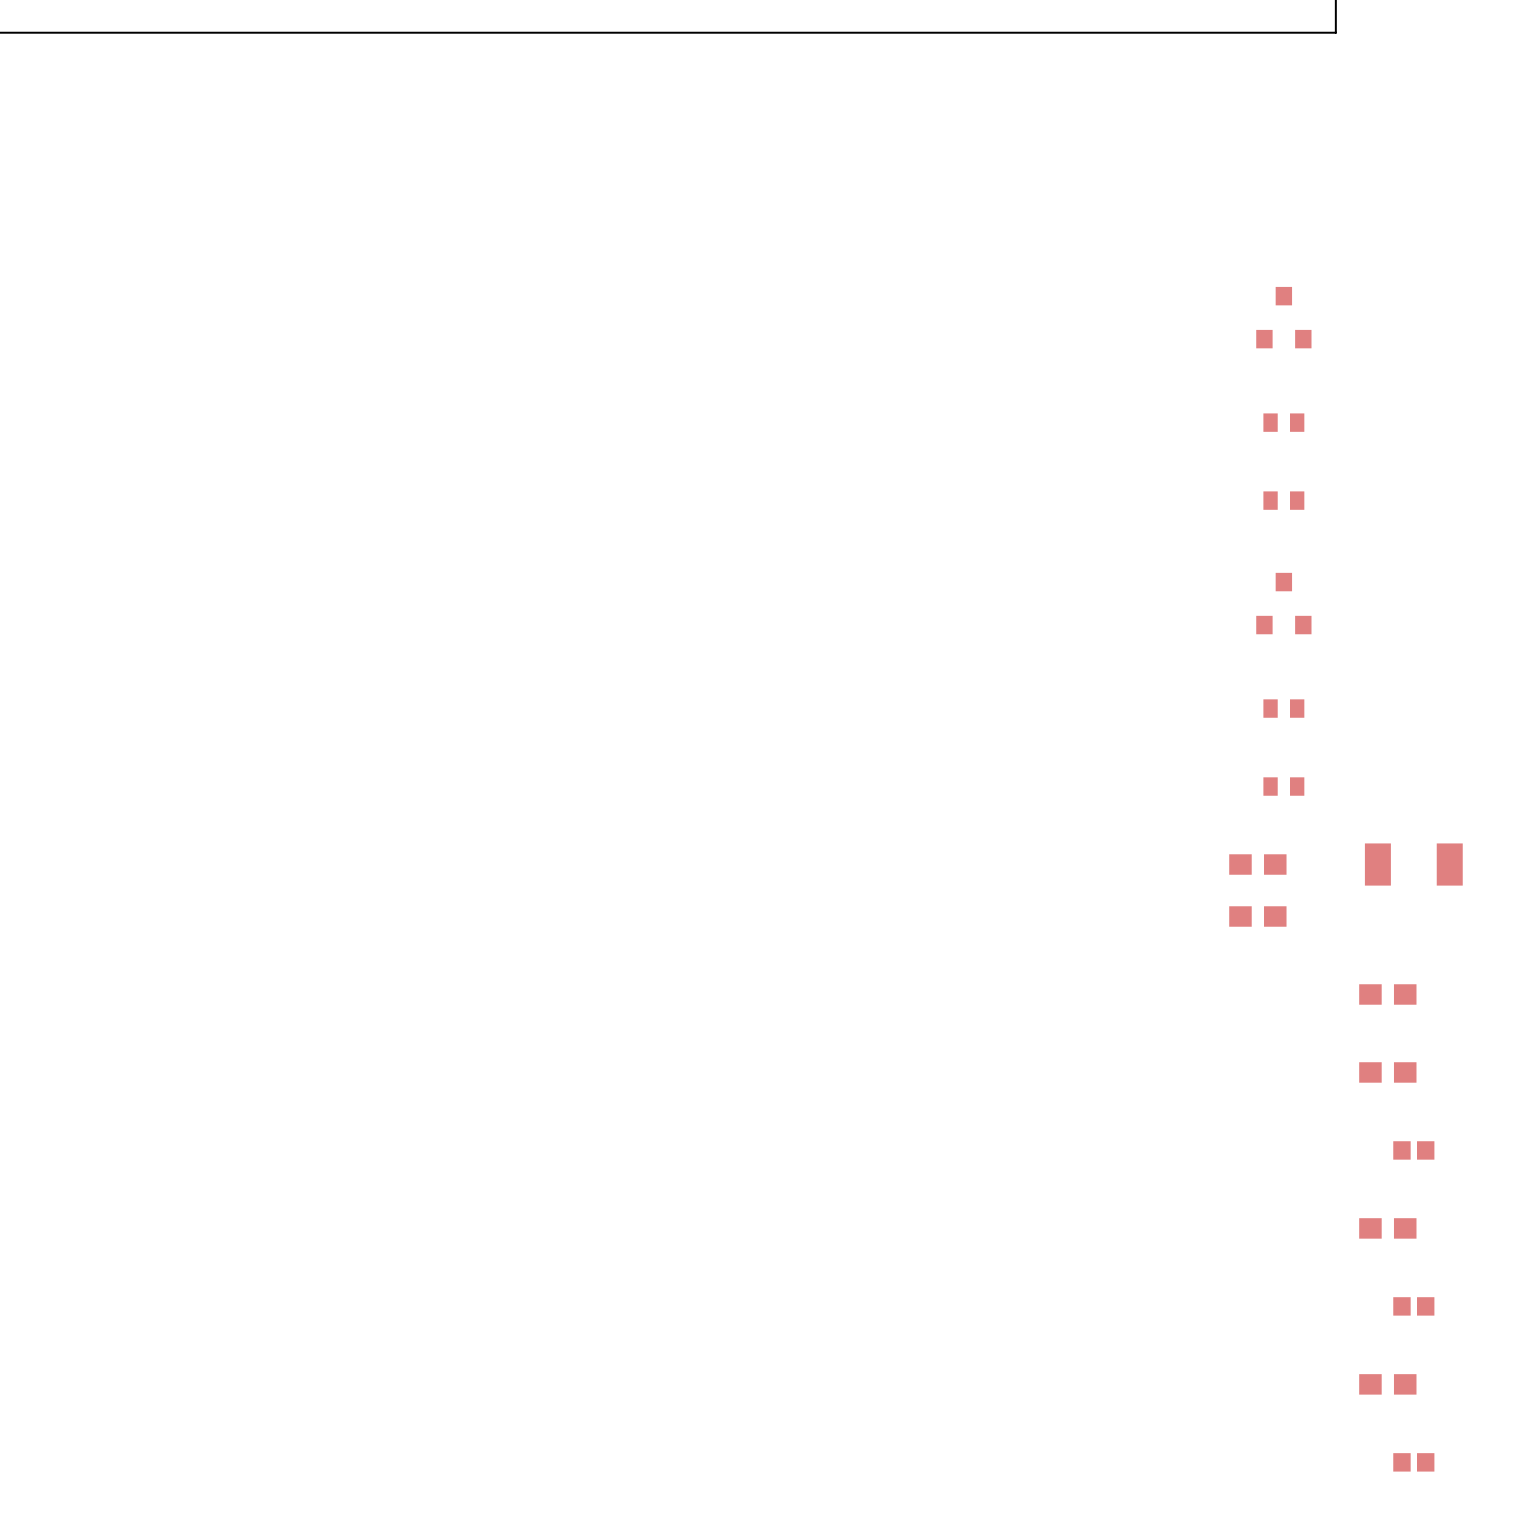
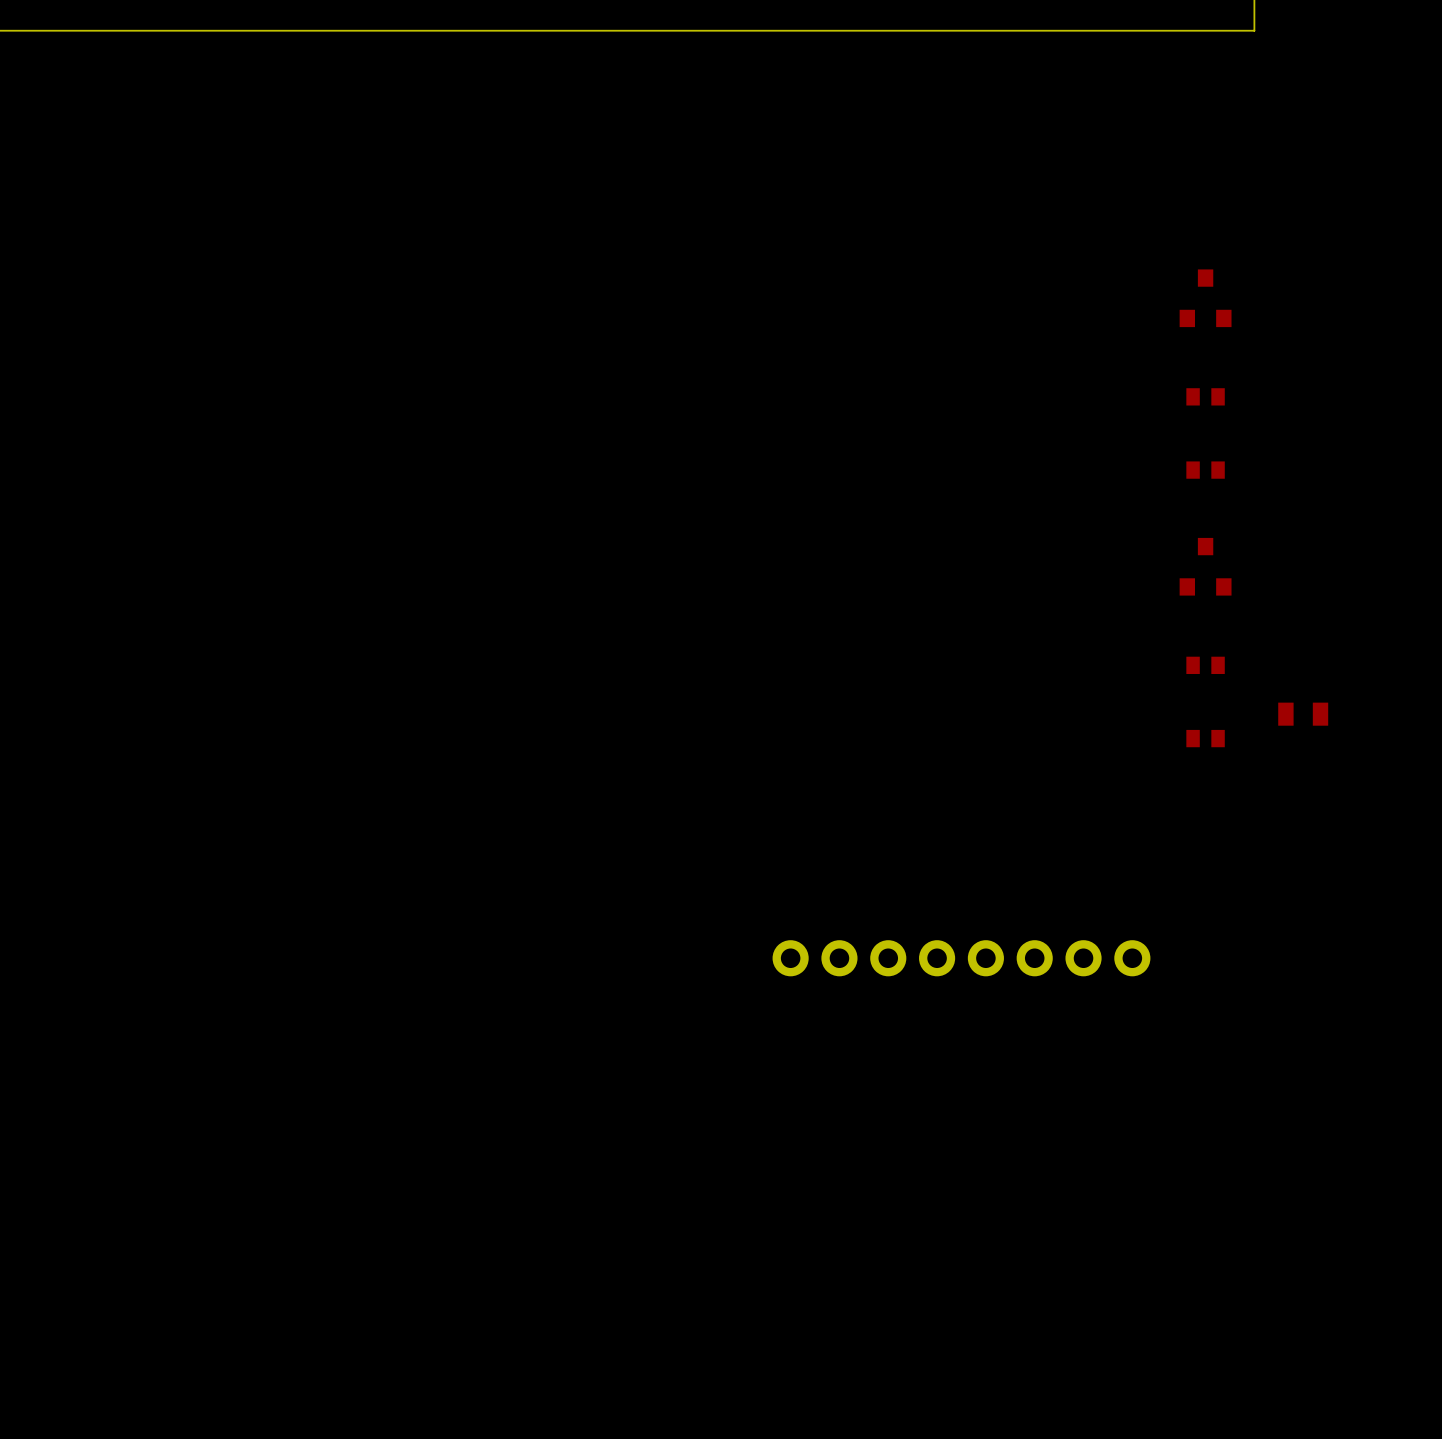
part: none -> (1303, 714)
part: (1257, 864) -> none
part: (1413, 864) -> none
part: (1257, 916) -> none
part: (1387, 994) -> none
part: none -> (961, 958)
part: (1387, 1072) -> none
part: (1413, 1150) -> none
part: (1387, 1228) -> none
part: (1413, 1306) -> none
part: (1387, 1384) -> none
part: (1413, 1462) -> none

